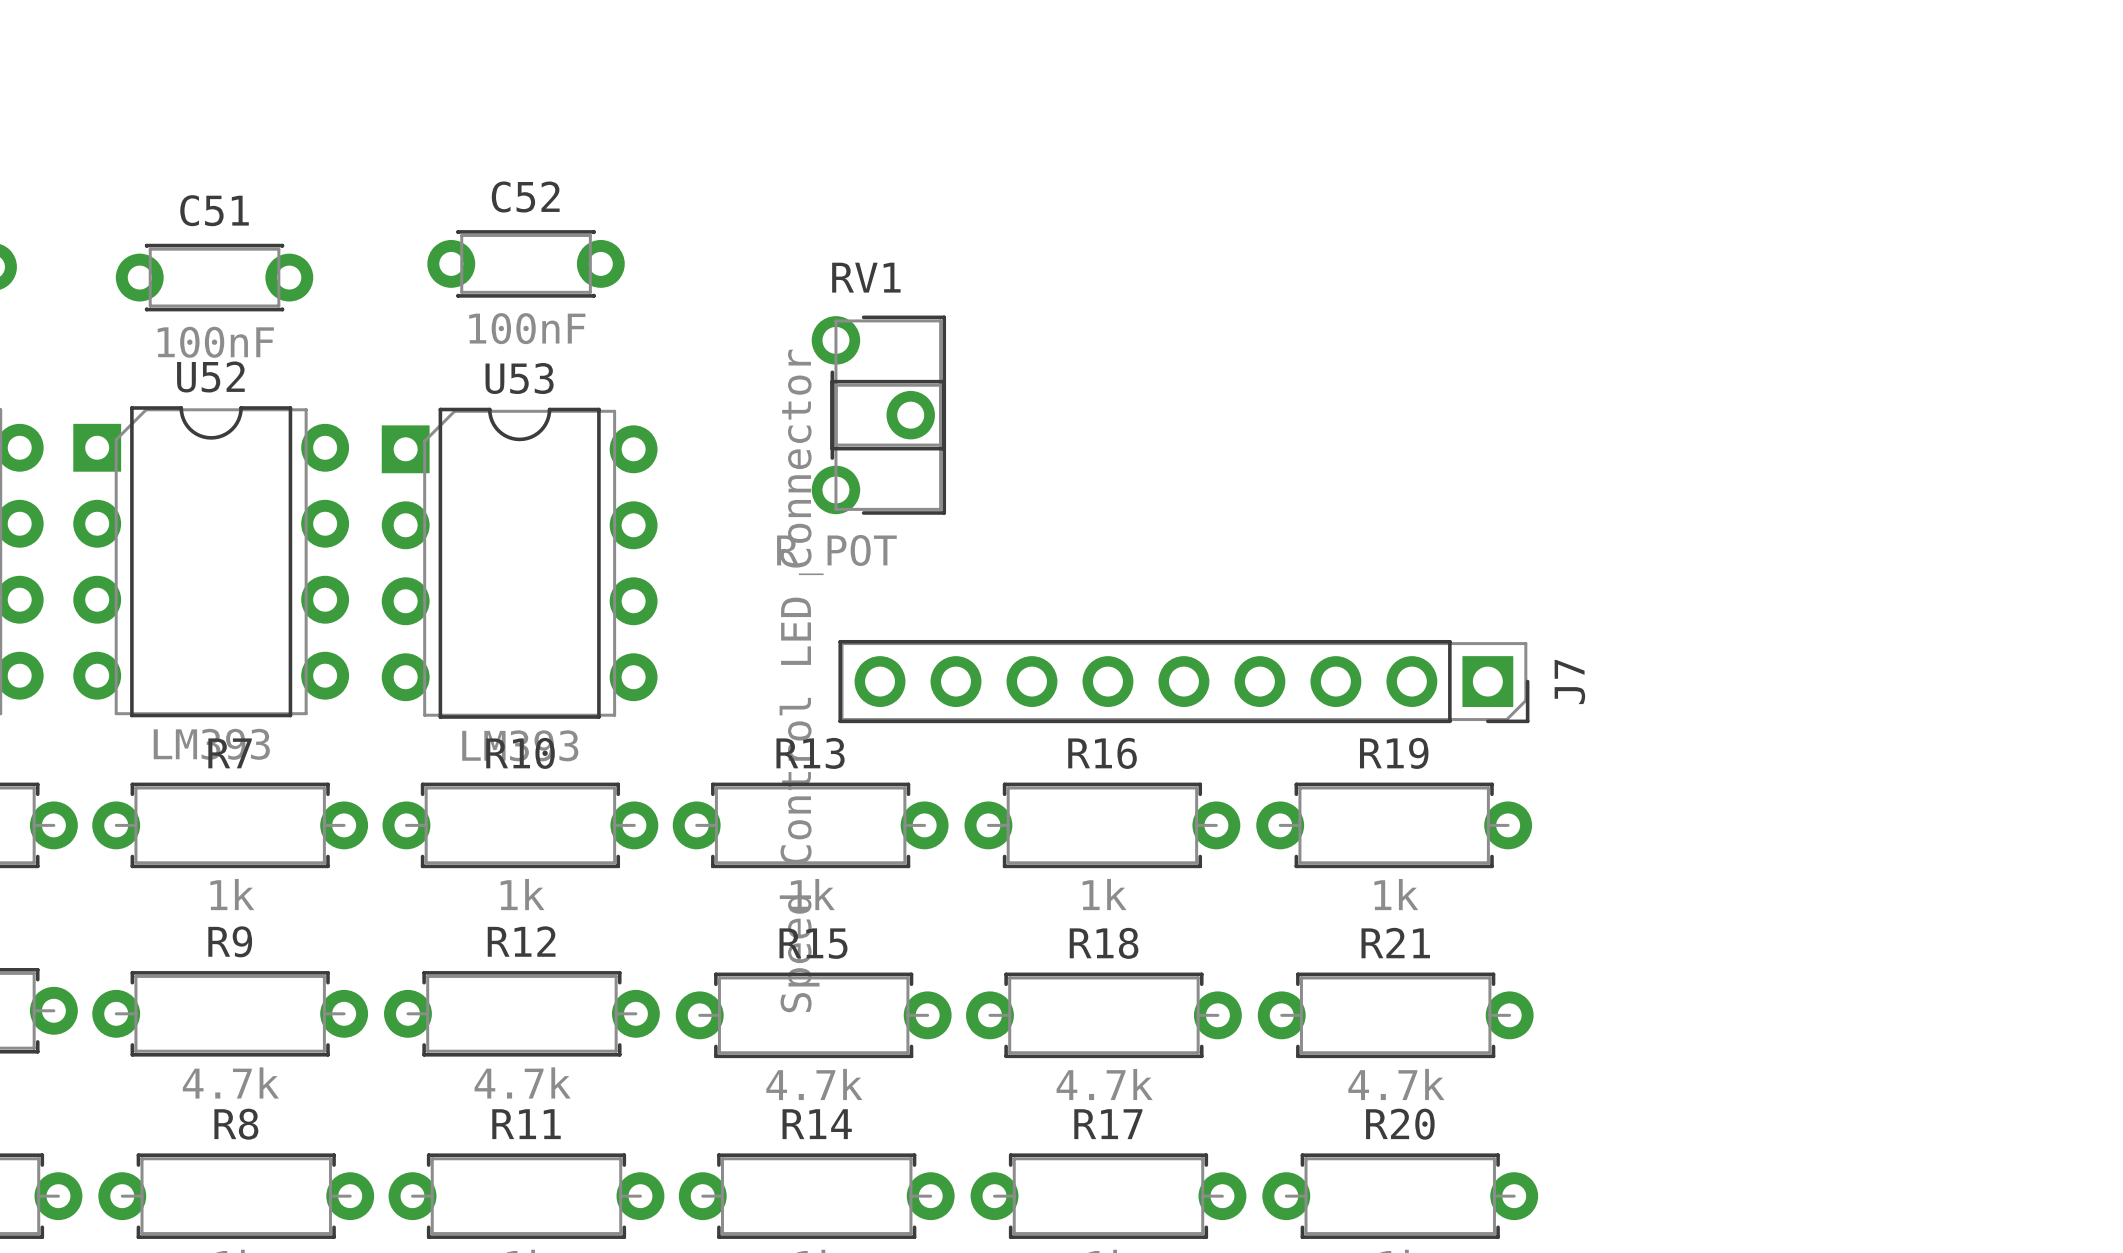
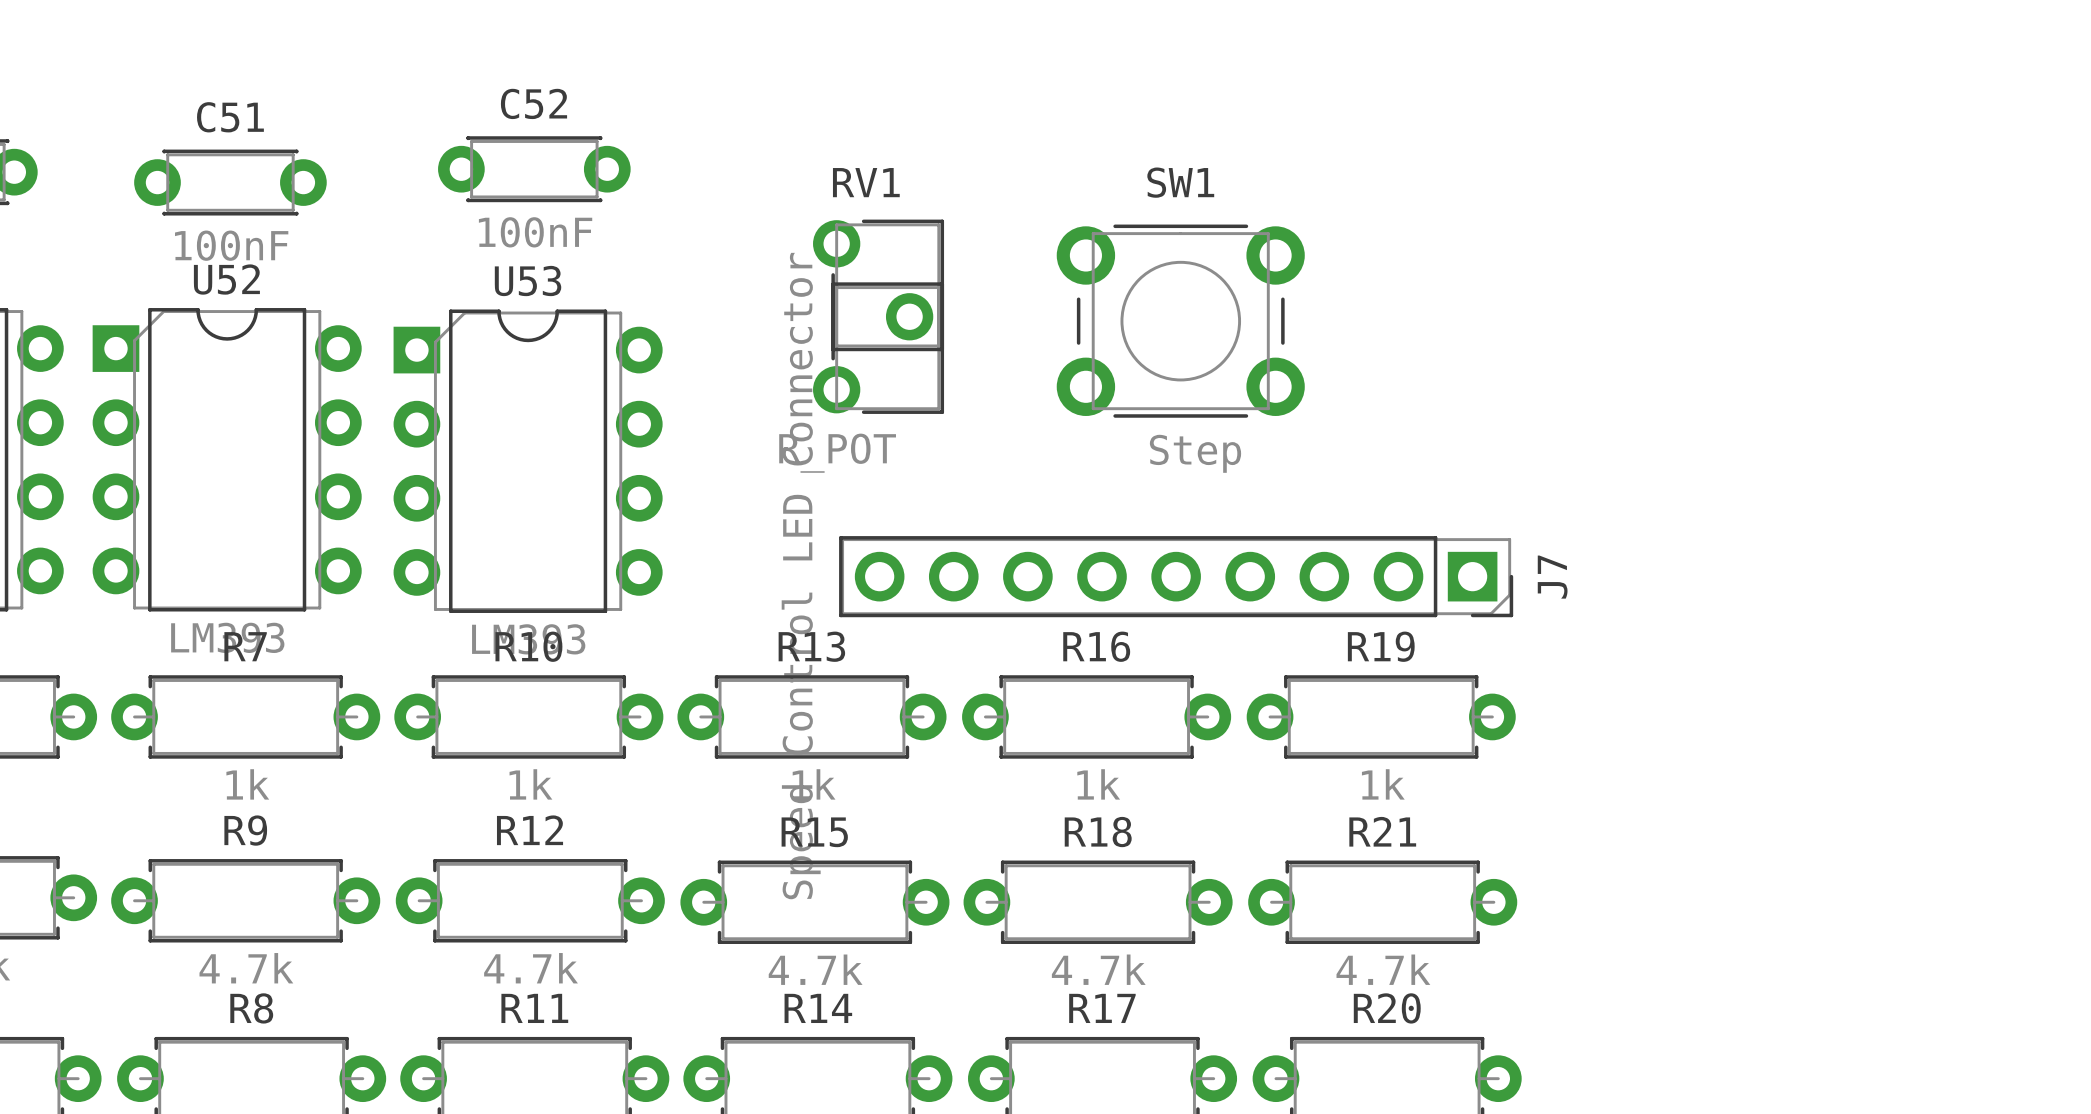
SW1: none -> Step (1180, 321)

